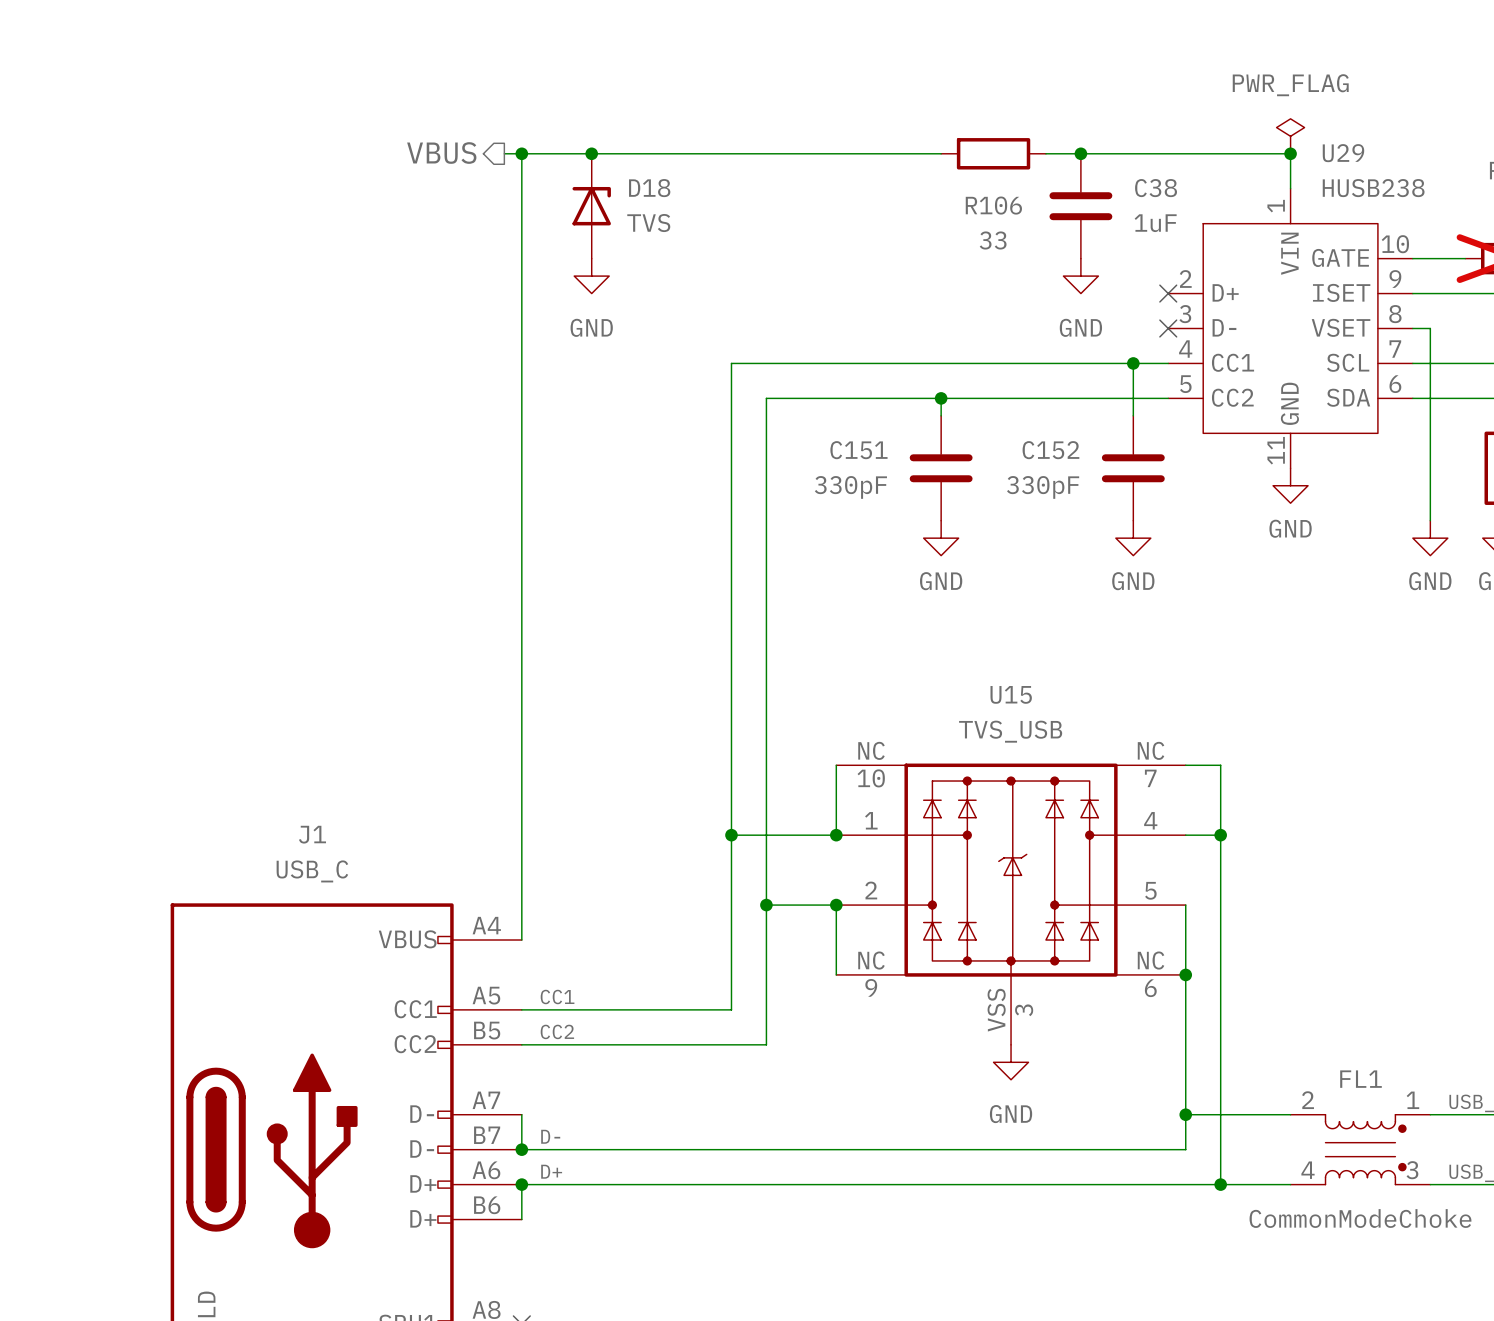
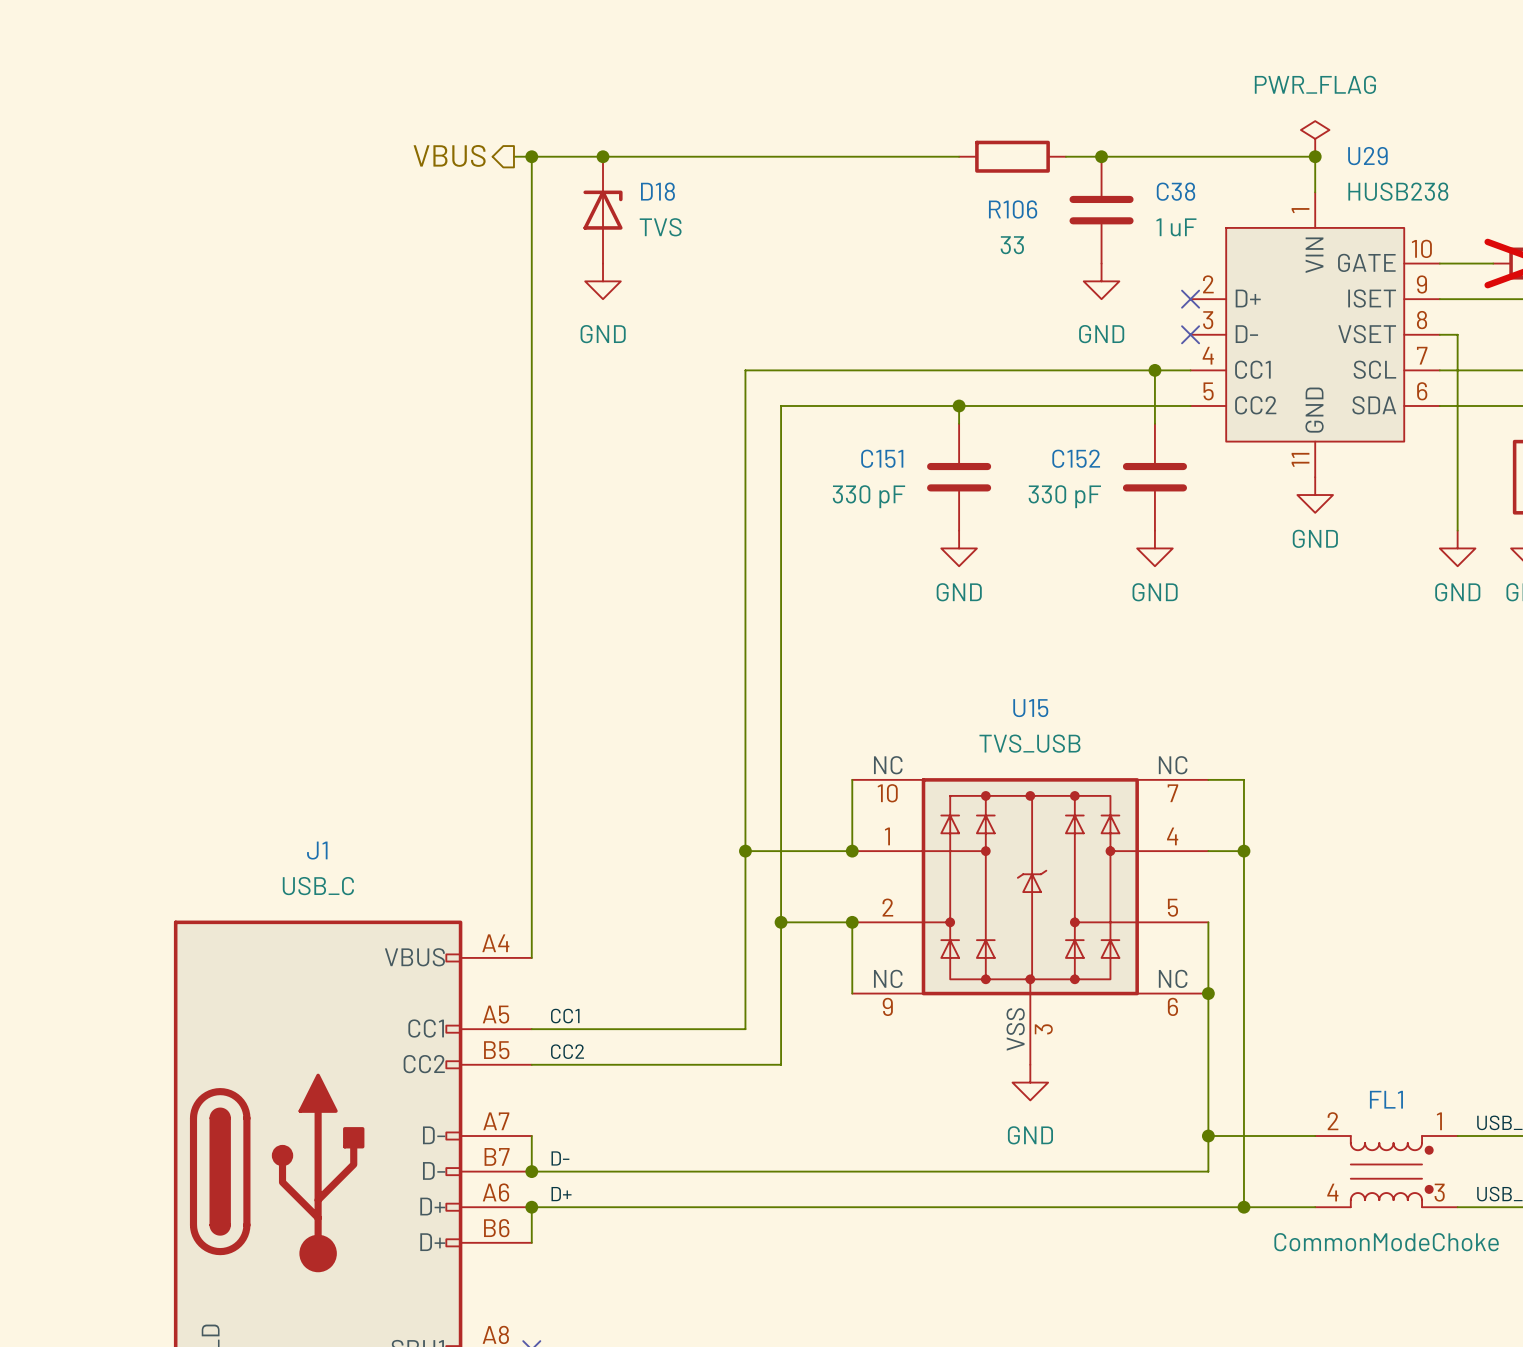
C38 value: 1uF (1155, 223) -> 1 uF (1176, 227)
C151 value: 330pF (850, 487) -> 330 pF (868, 496)
C152 value: 330pF (1043, 487) -> 330 pF (1064, 496)

